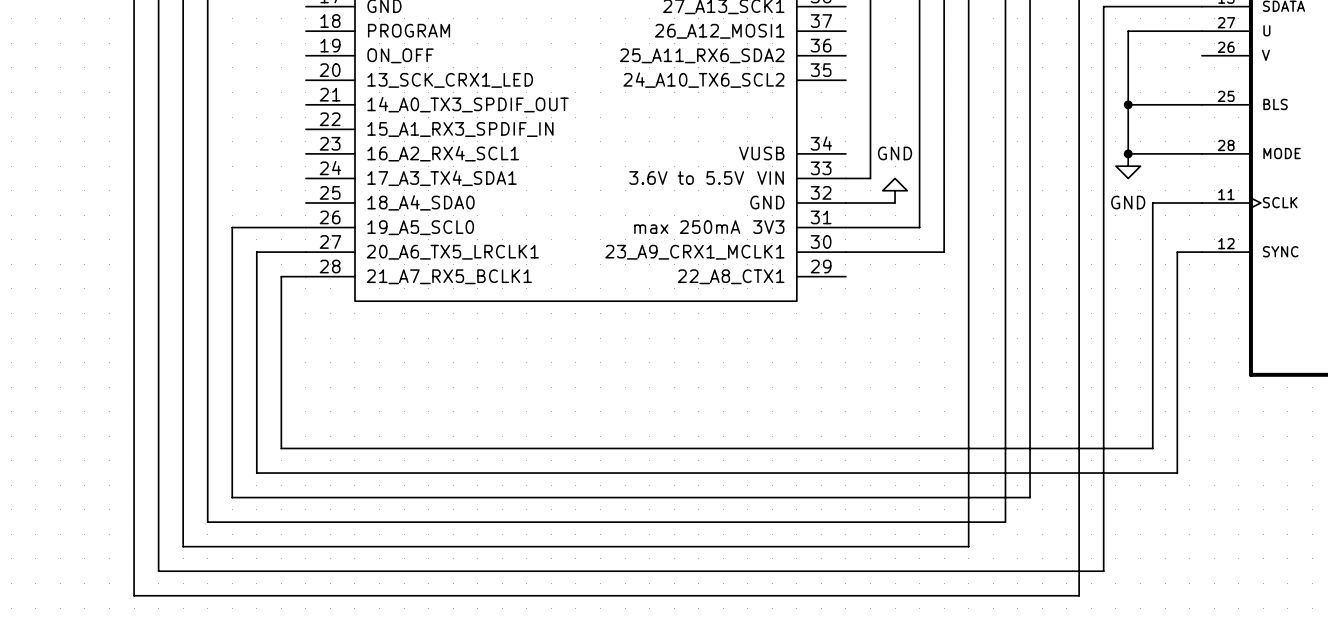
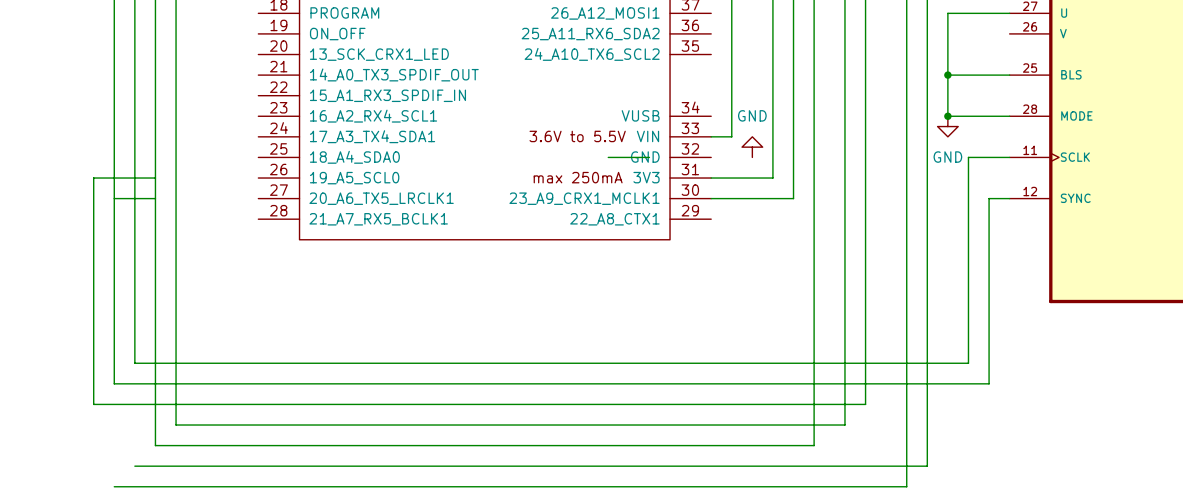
wire: (845, 203) (895, 203) -> (608, 157) (649, 157)
wire: (305, 227) (232, 227) (232, 497) -> (155, 178) (93, 178) (93, 404) (196, 404)
wire: none -> (114, 198) (155, 198)
wire: (305, 252) (256, 252) (256, 473) -> none
wire: (305, 276) (281, 276) (281, 448) -> none
wire: (158, 448) (158, 571) -> (134, 363) (237, 363)
wire: (134, 473) (134, 595) -> (114, 383) (217, 383)

